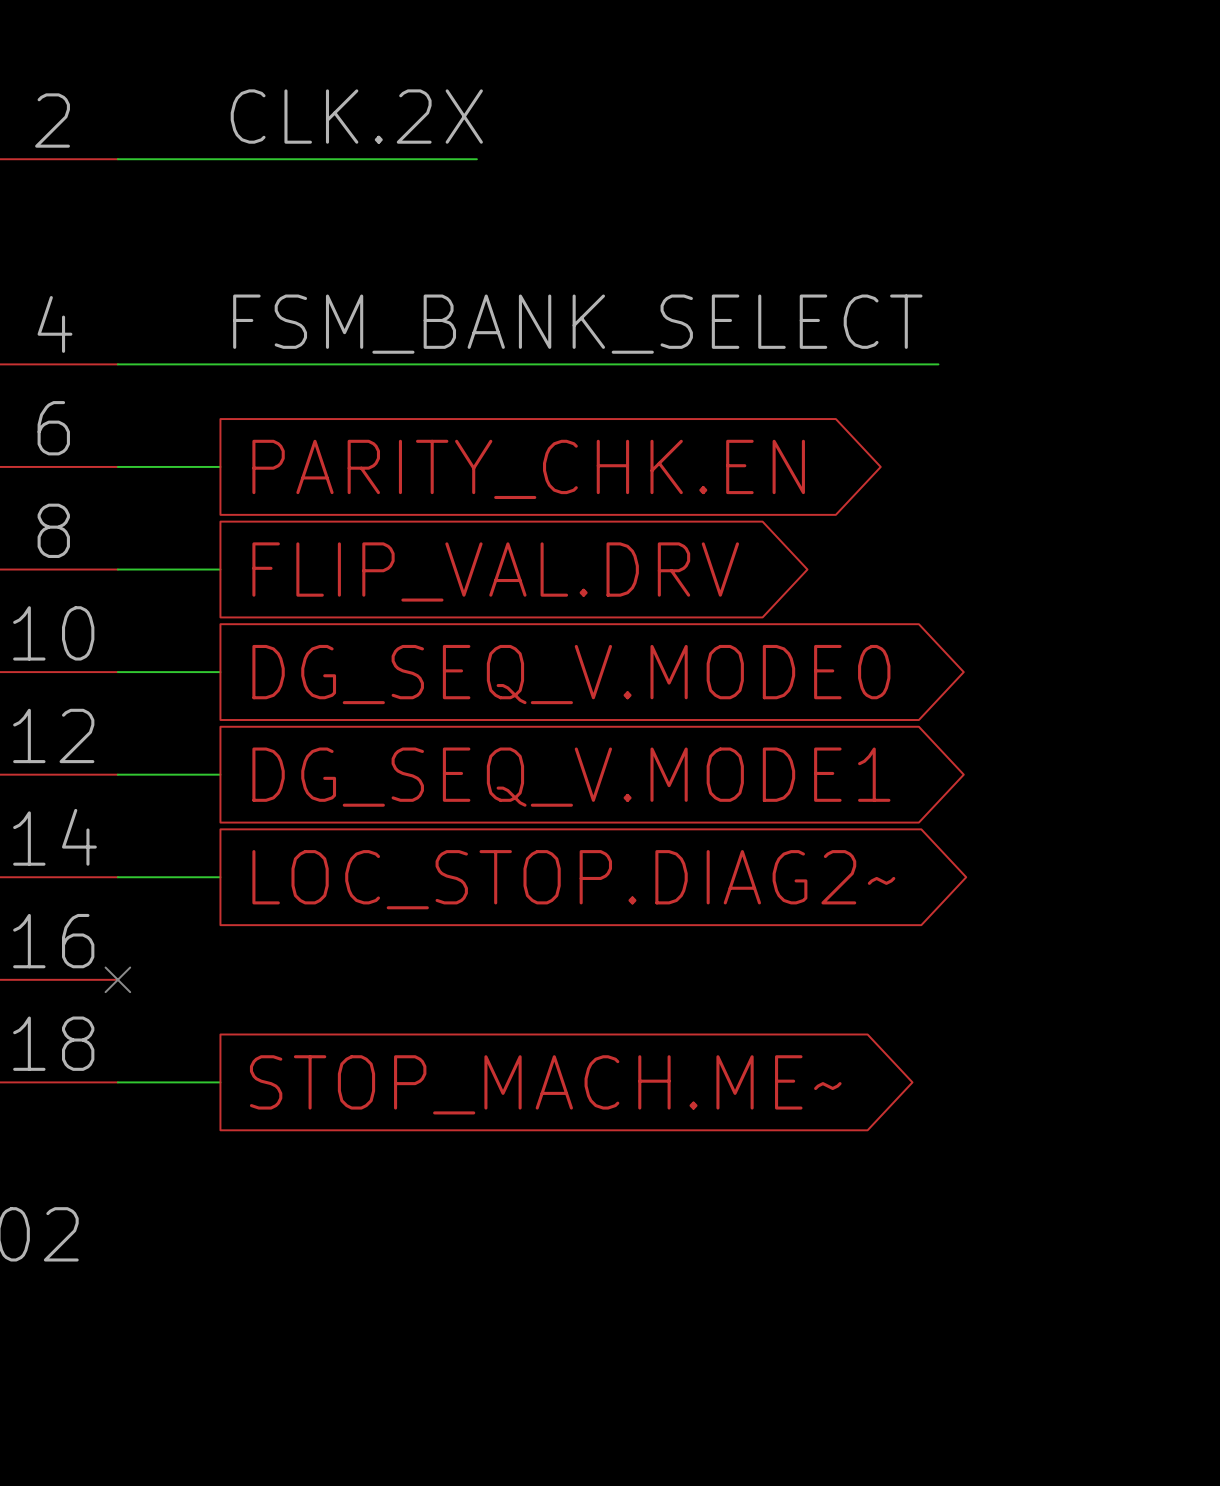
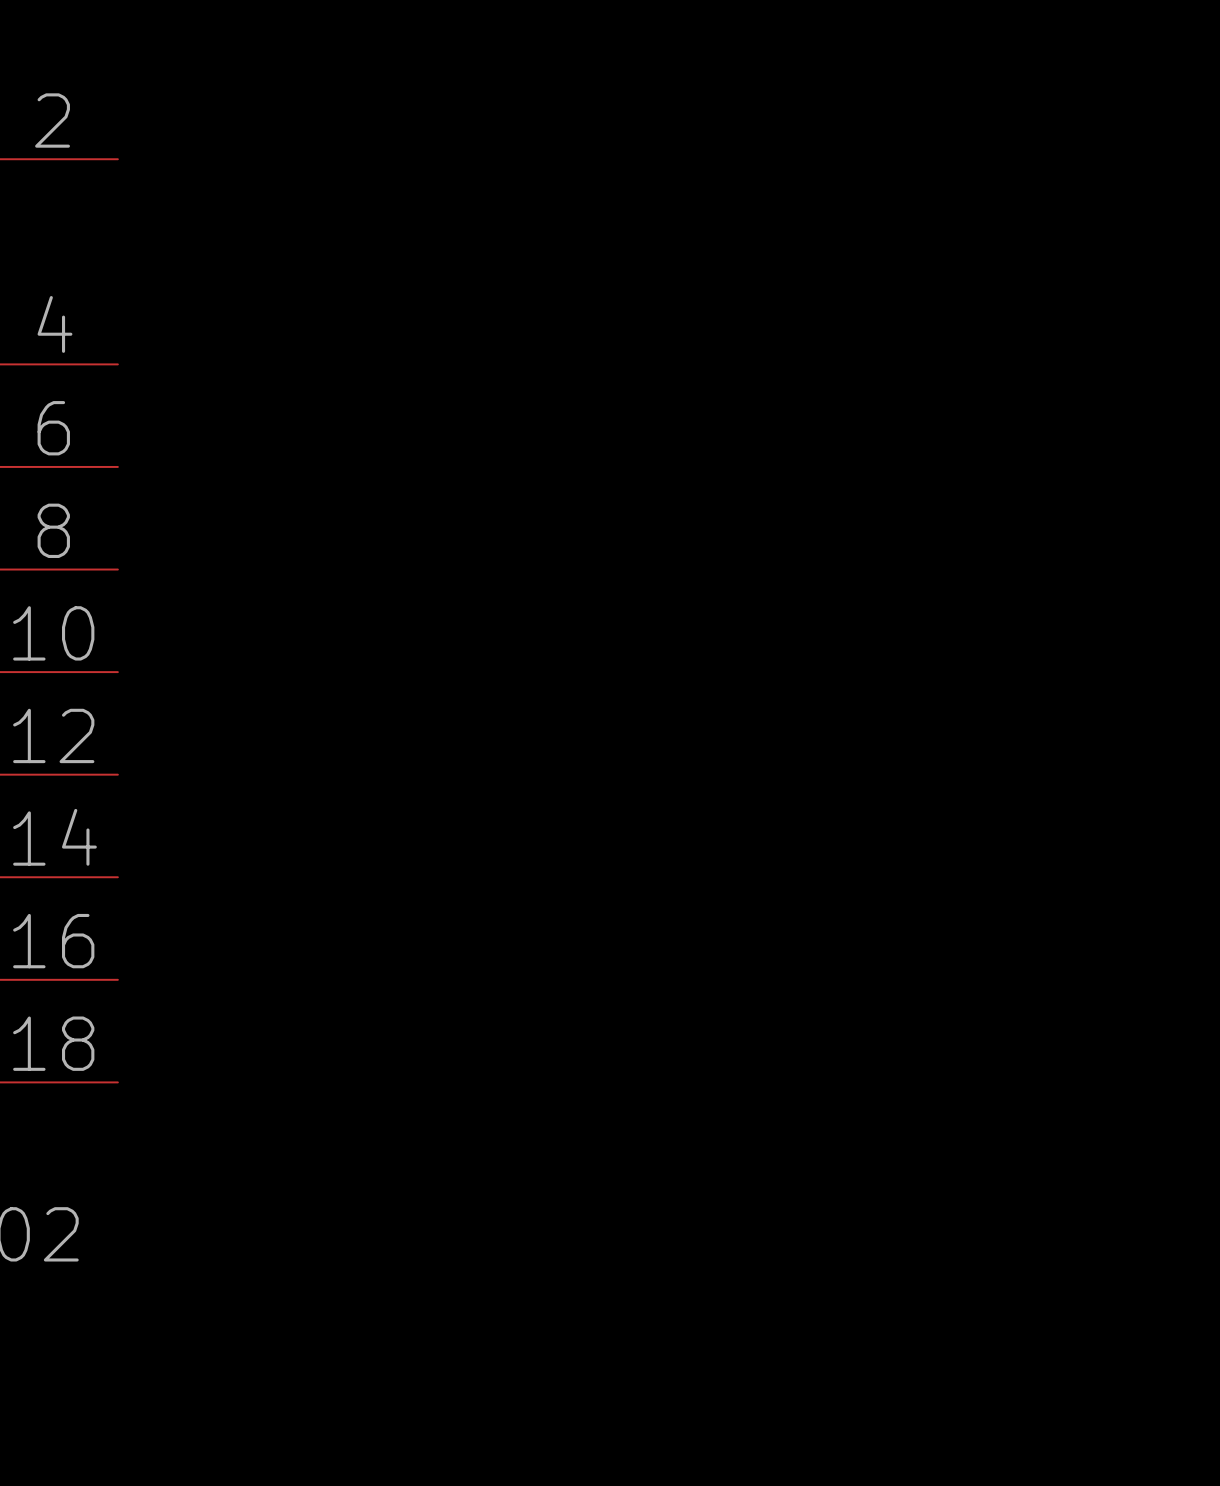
label: CLK.2X (356, 116) -> none
wire: (117, 159) (476, 159) -> none
label: FSM_BANK_SELECT (577, 324) -> none
wire: (117, 364) (938, 364) -> none
wire: (117, 466) (220, 466) -> none
global label: PARITY_CHK.EN (528, 469) -> none
wire: (117, 569) (220, 569) -> none
global label: FLIP_VAL.DRV (495, 571) -> none
wire: (117, 672) (220, 672) -> none
global label: DG_SEQ_V.MODE0 (571, 674) -> none
wire: (117, 774) (220, 774) -> none
global label: DG_SEQ_V.MODE1 (571, 777) -> none
wire: (117, 877) (220, 877) -> none
global label: LOC_STOP.DIAG2~ (573, 879) -> none
no-connect mark: (117, 979) -> none
wire: (117, 1082) (220, 1082) -> none
global label: STOP_MACH.ME~ (545, 1084) -> none

